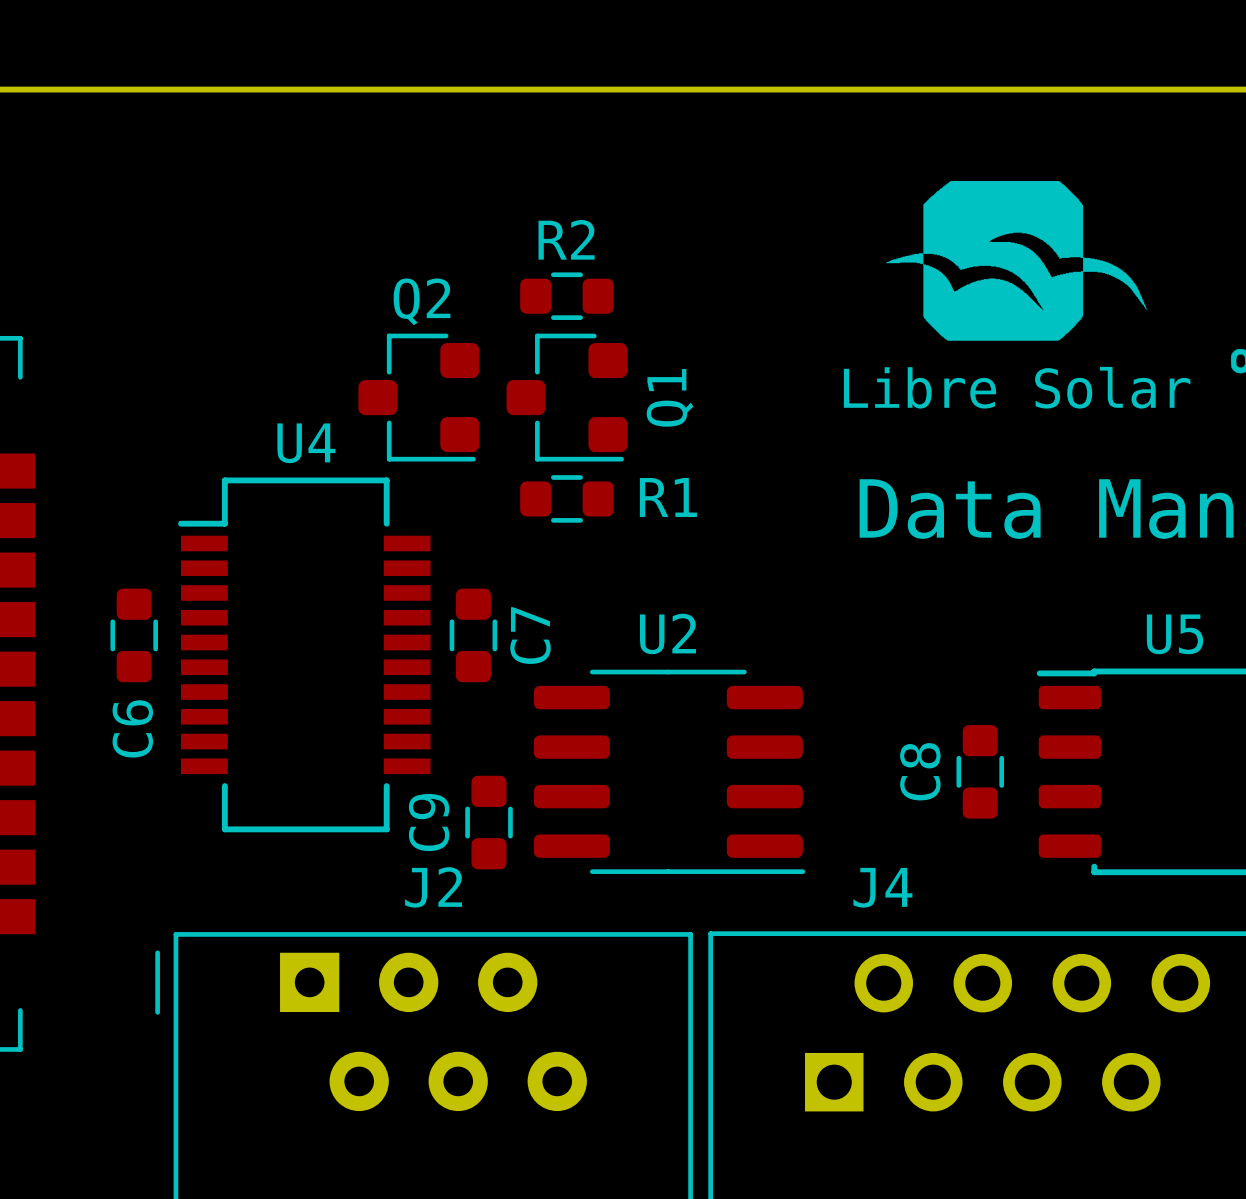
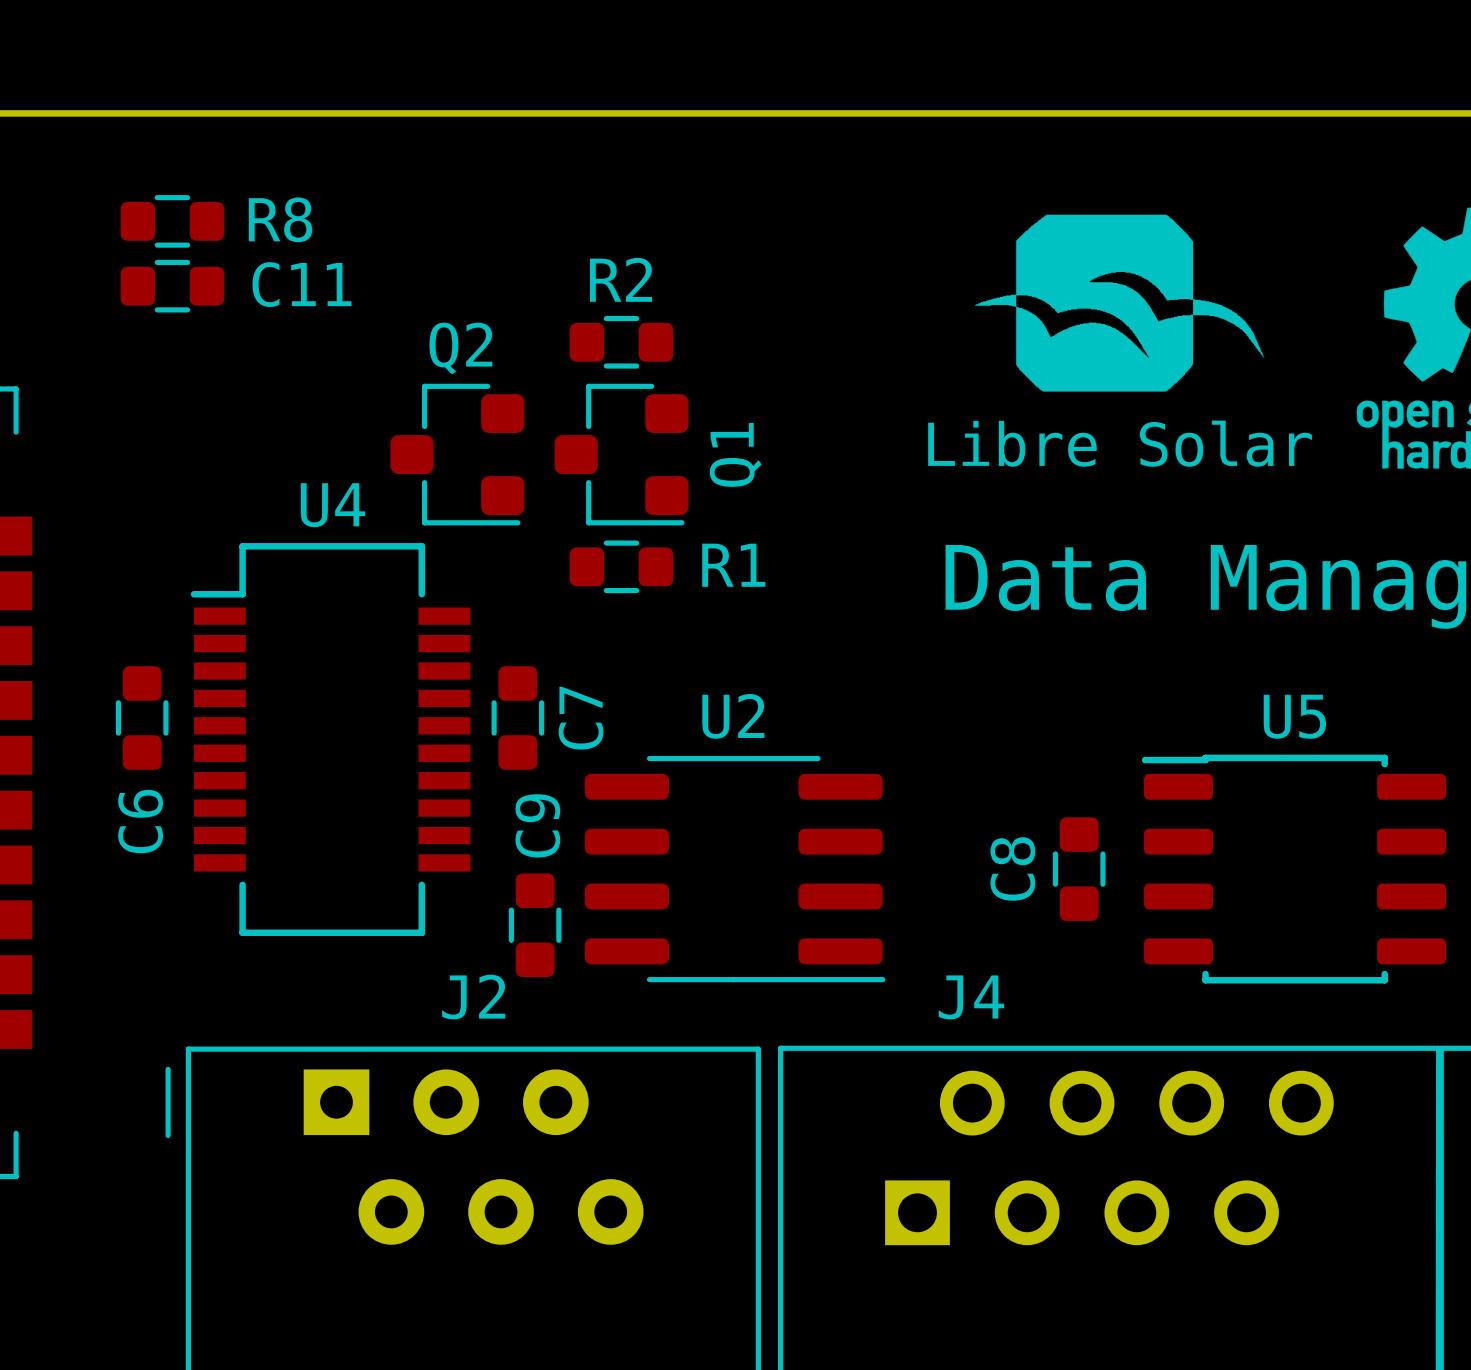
R8: none -> (172, 221)
C11: none -> (172, 286)
C9 name position: C9 (429, 822) -> C9 (537, 825)

